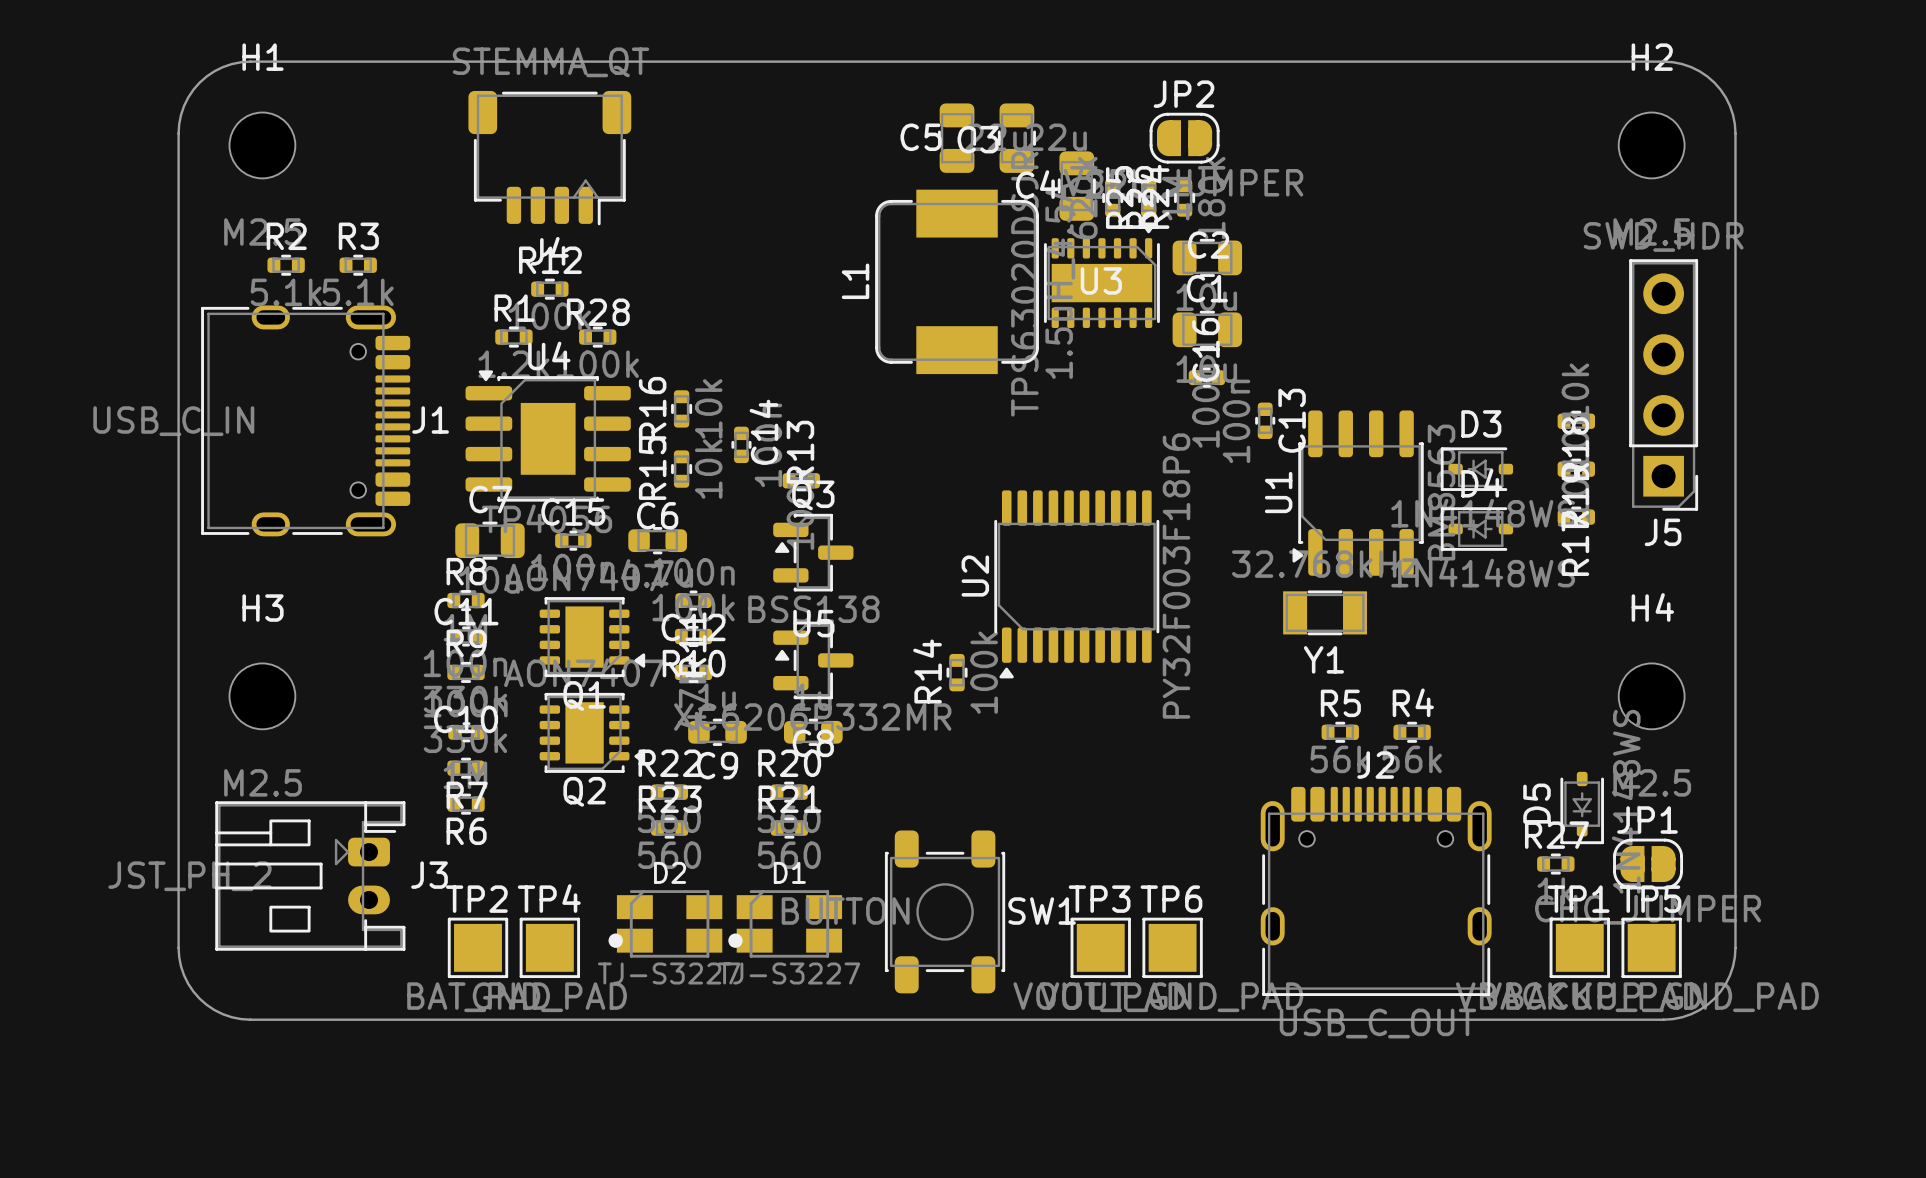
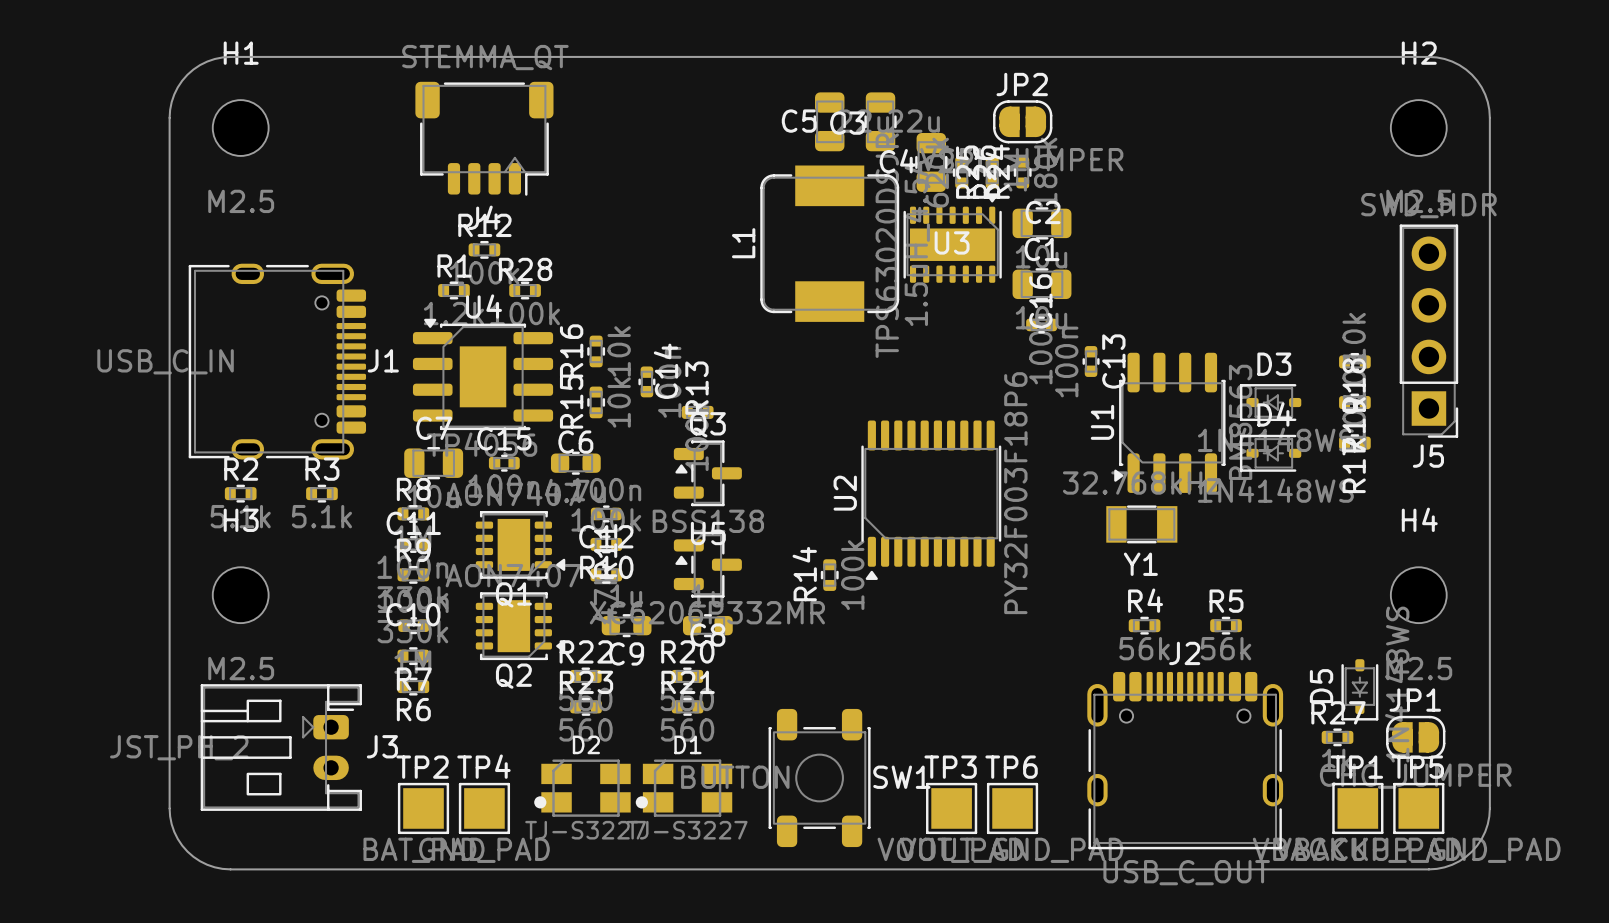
R2 position: (286, 265) -> (240, 493)
R3 position: (358, 265) -> (321, 493)
R5 position: (1340, 732) -> (1226, 625)
R4 position: (1412, 732) -> (1144, 625)

